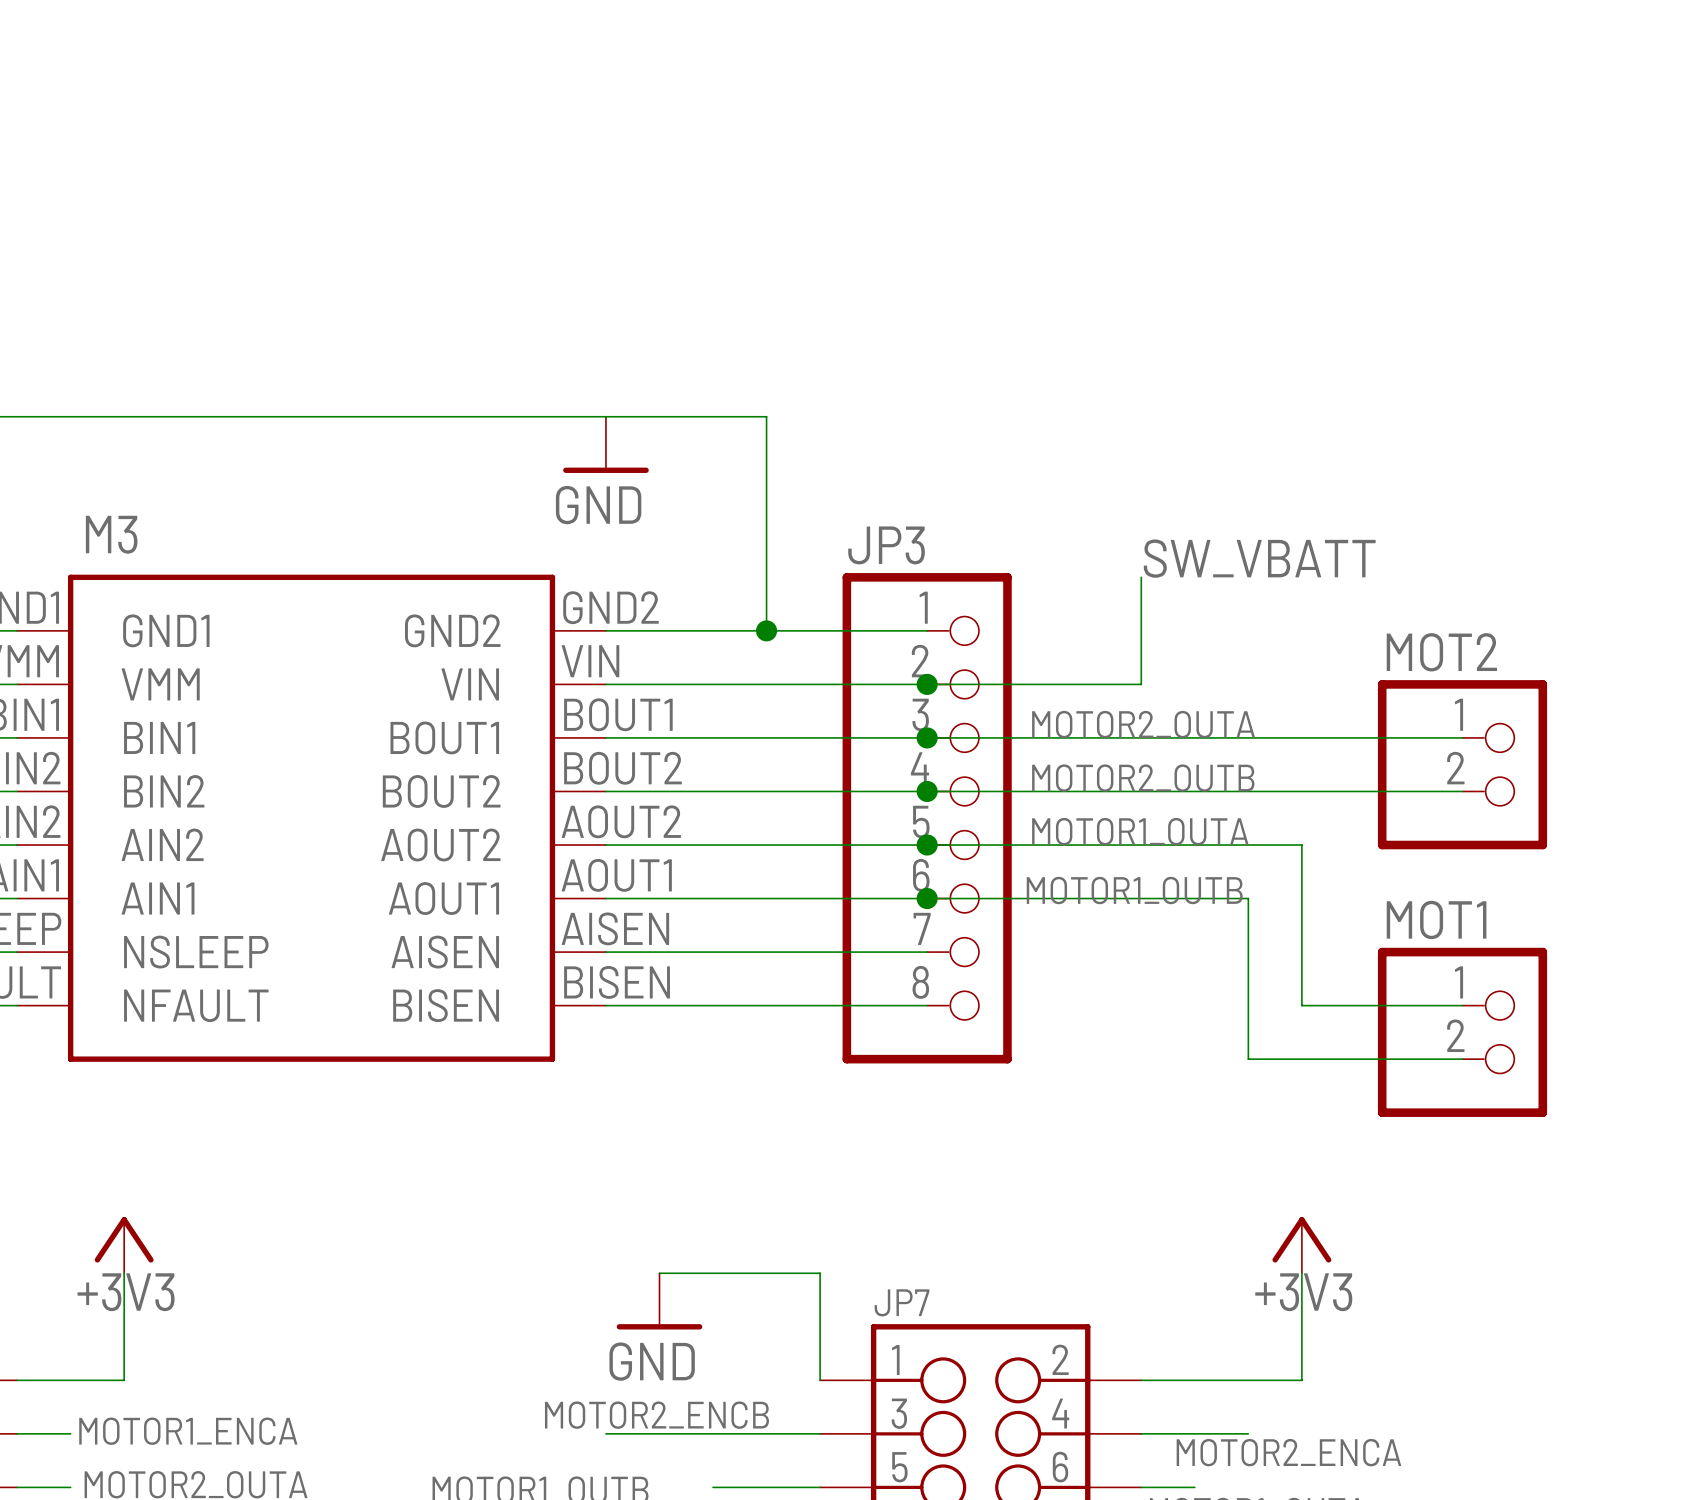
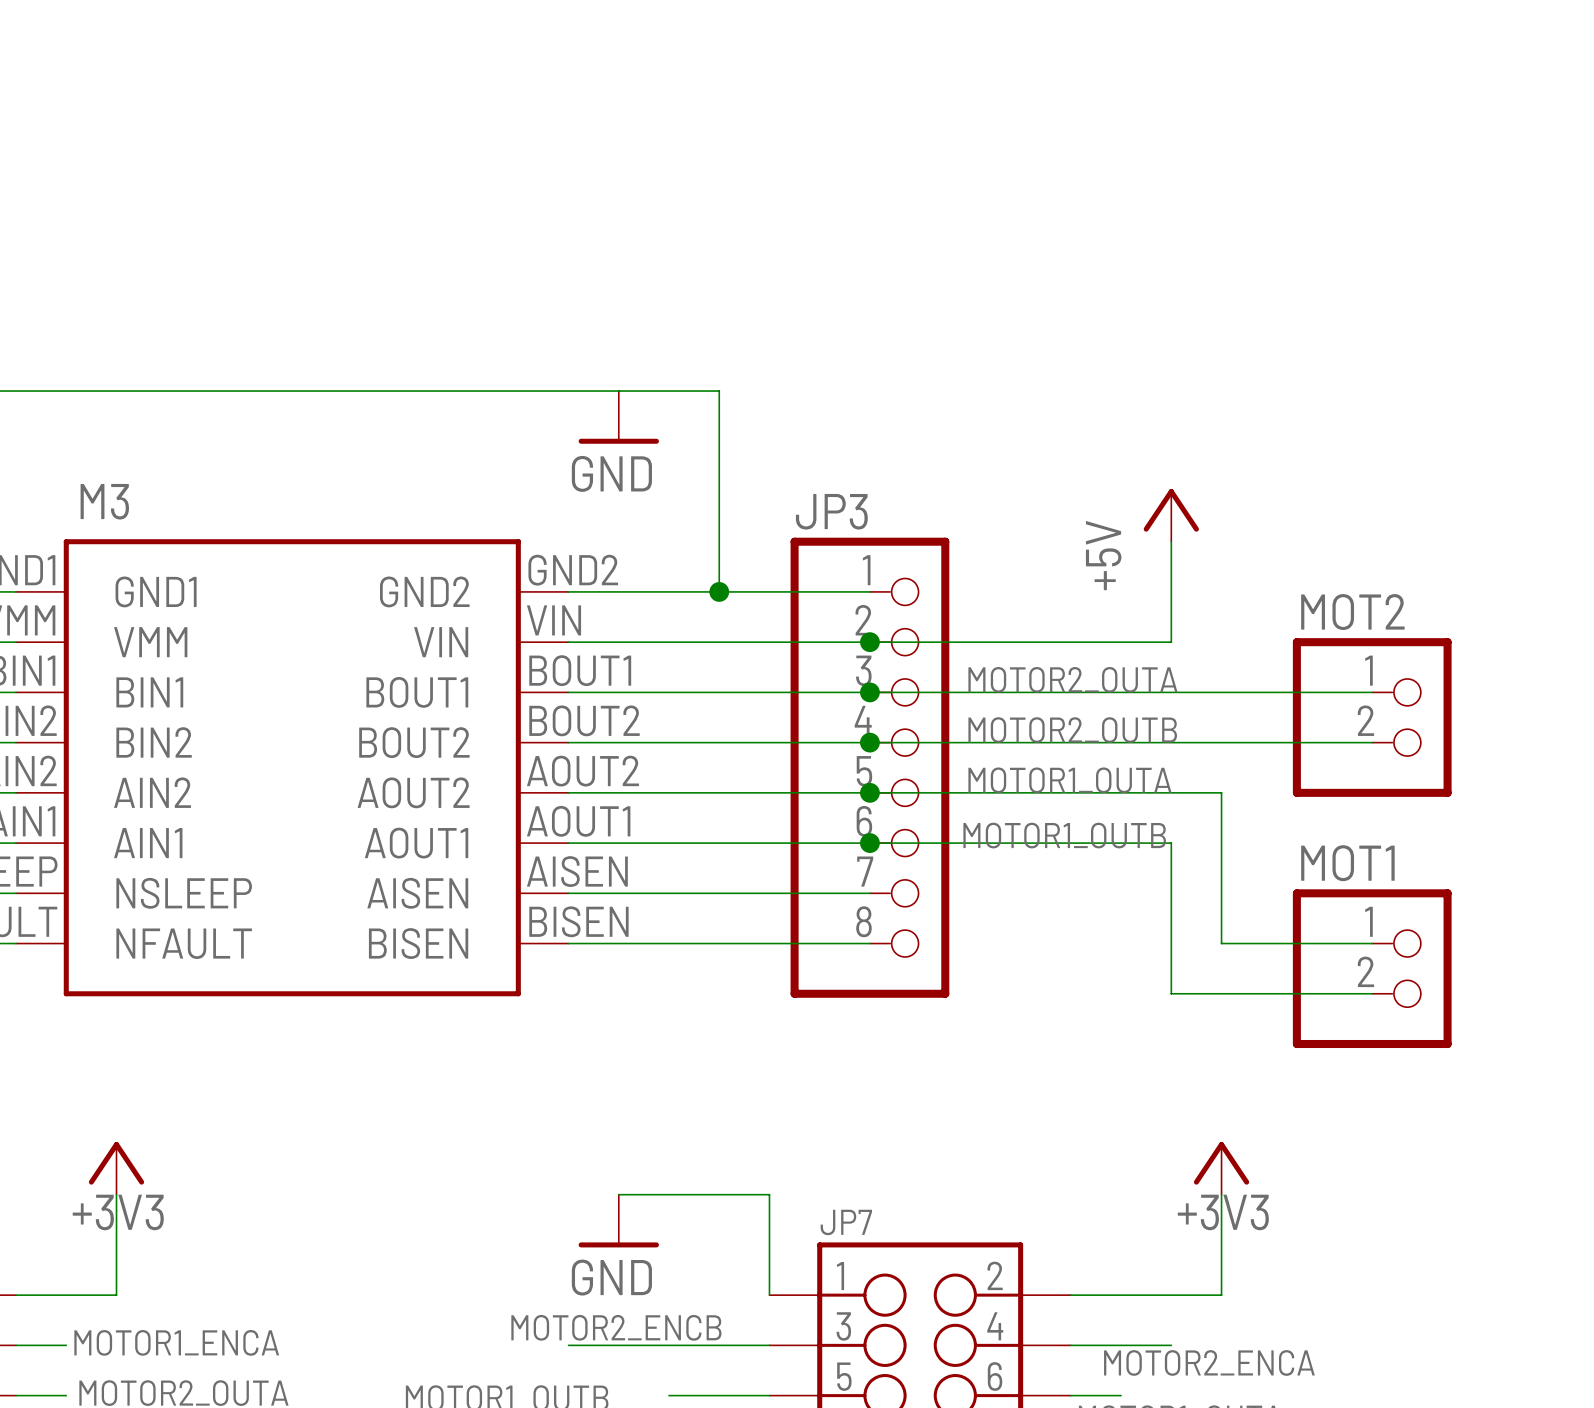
power symbol position: GND (605, 444) -> GND (618, 417)
power symbol: none -> +5V (1171, 515)
label: SW_VBATT (1259, 558) -> none
wire: (1141, 577) (1141, 684) -> (1171, 541) (1171, 642) (1070, 642)

